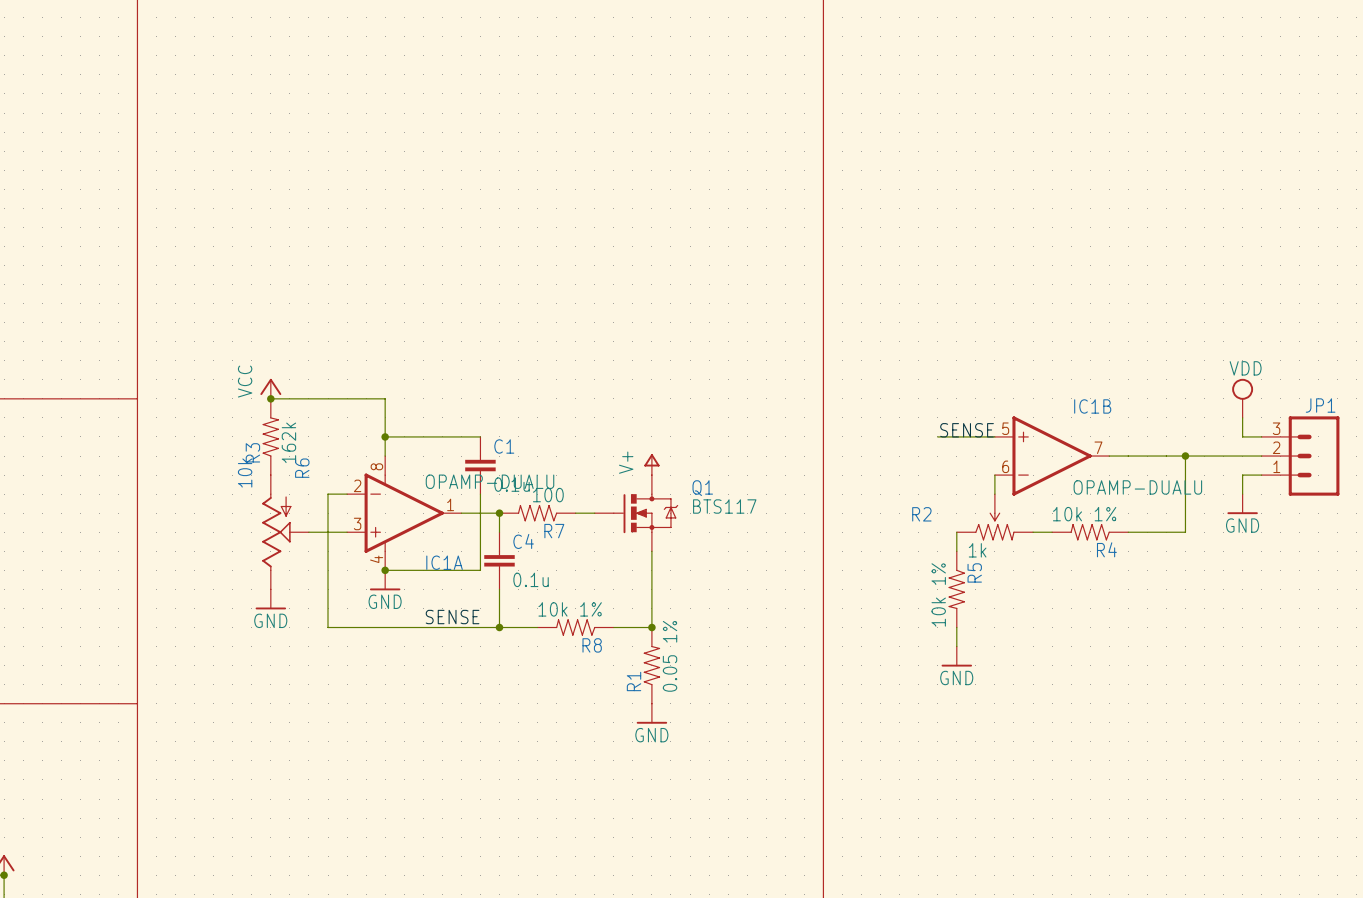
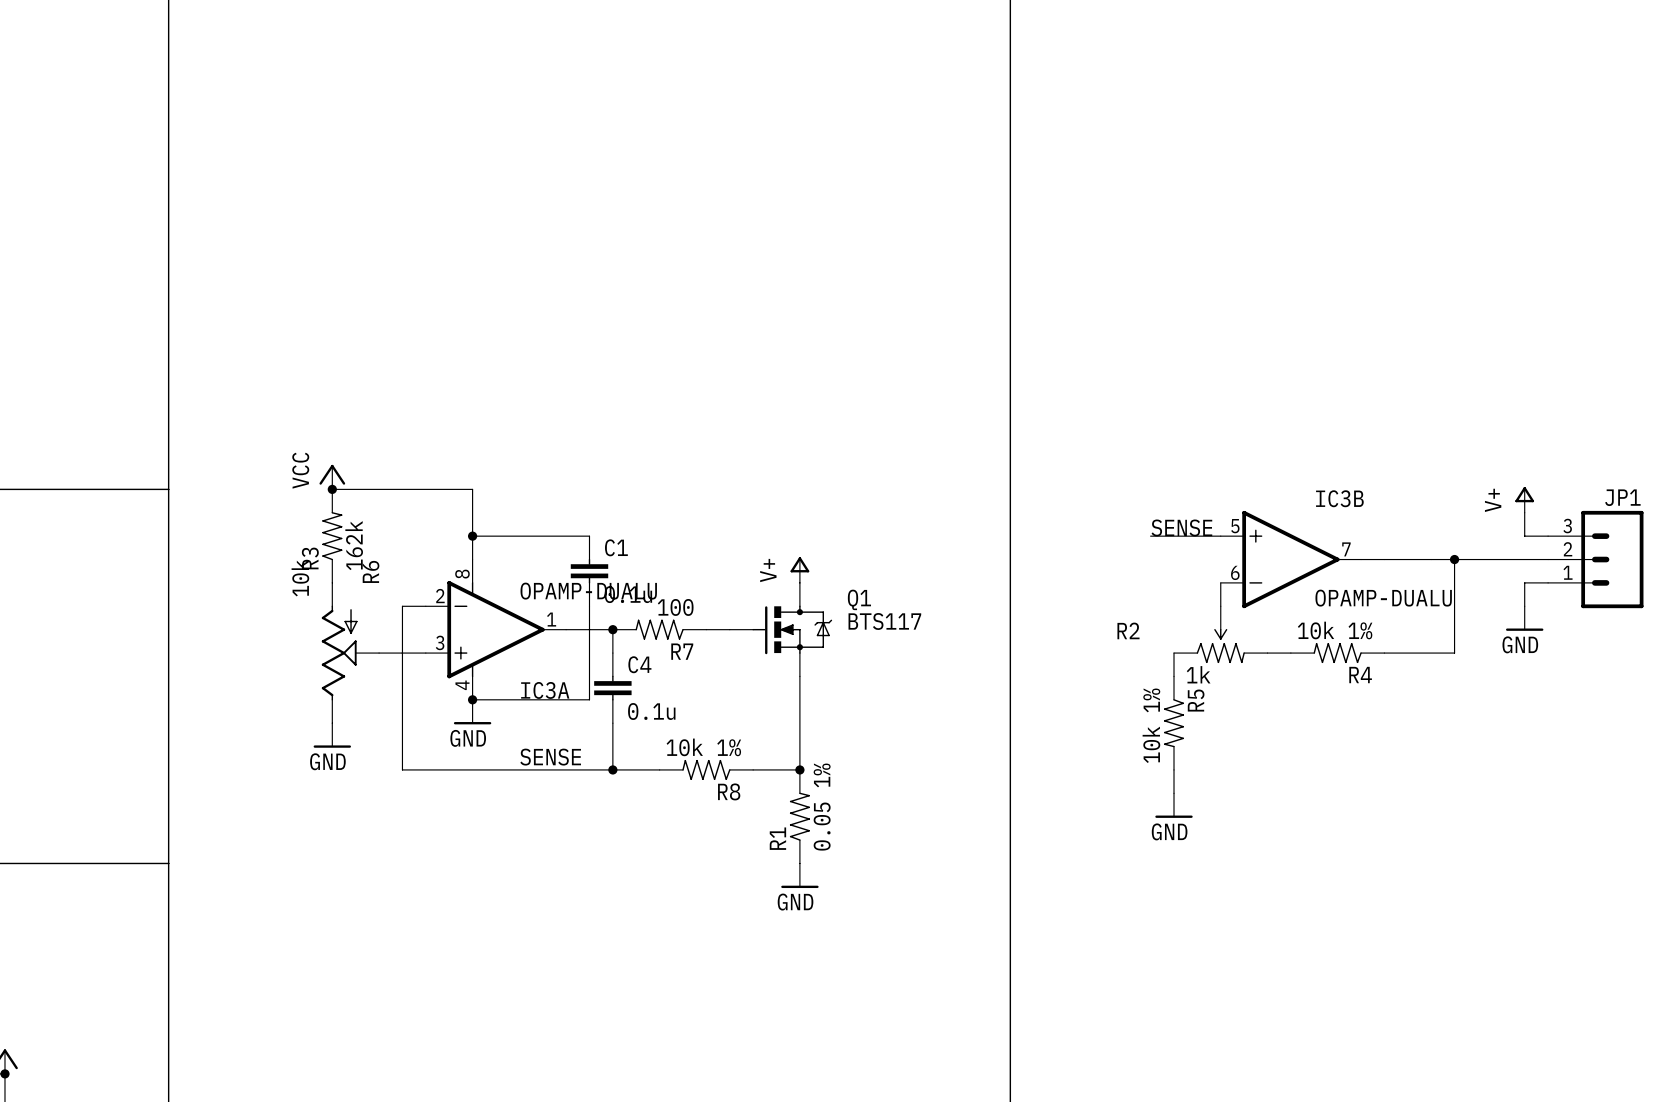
power symbol: VDD (1242, 398) -> none
IC1B name: IC1B (1092, 406) -> IC3B (1339, 498)
power symbol: none -> V+ (1524, 499)
IC1A name: IC1A (444, 562) -> IC3A (545, 690)

